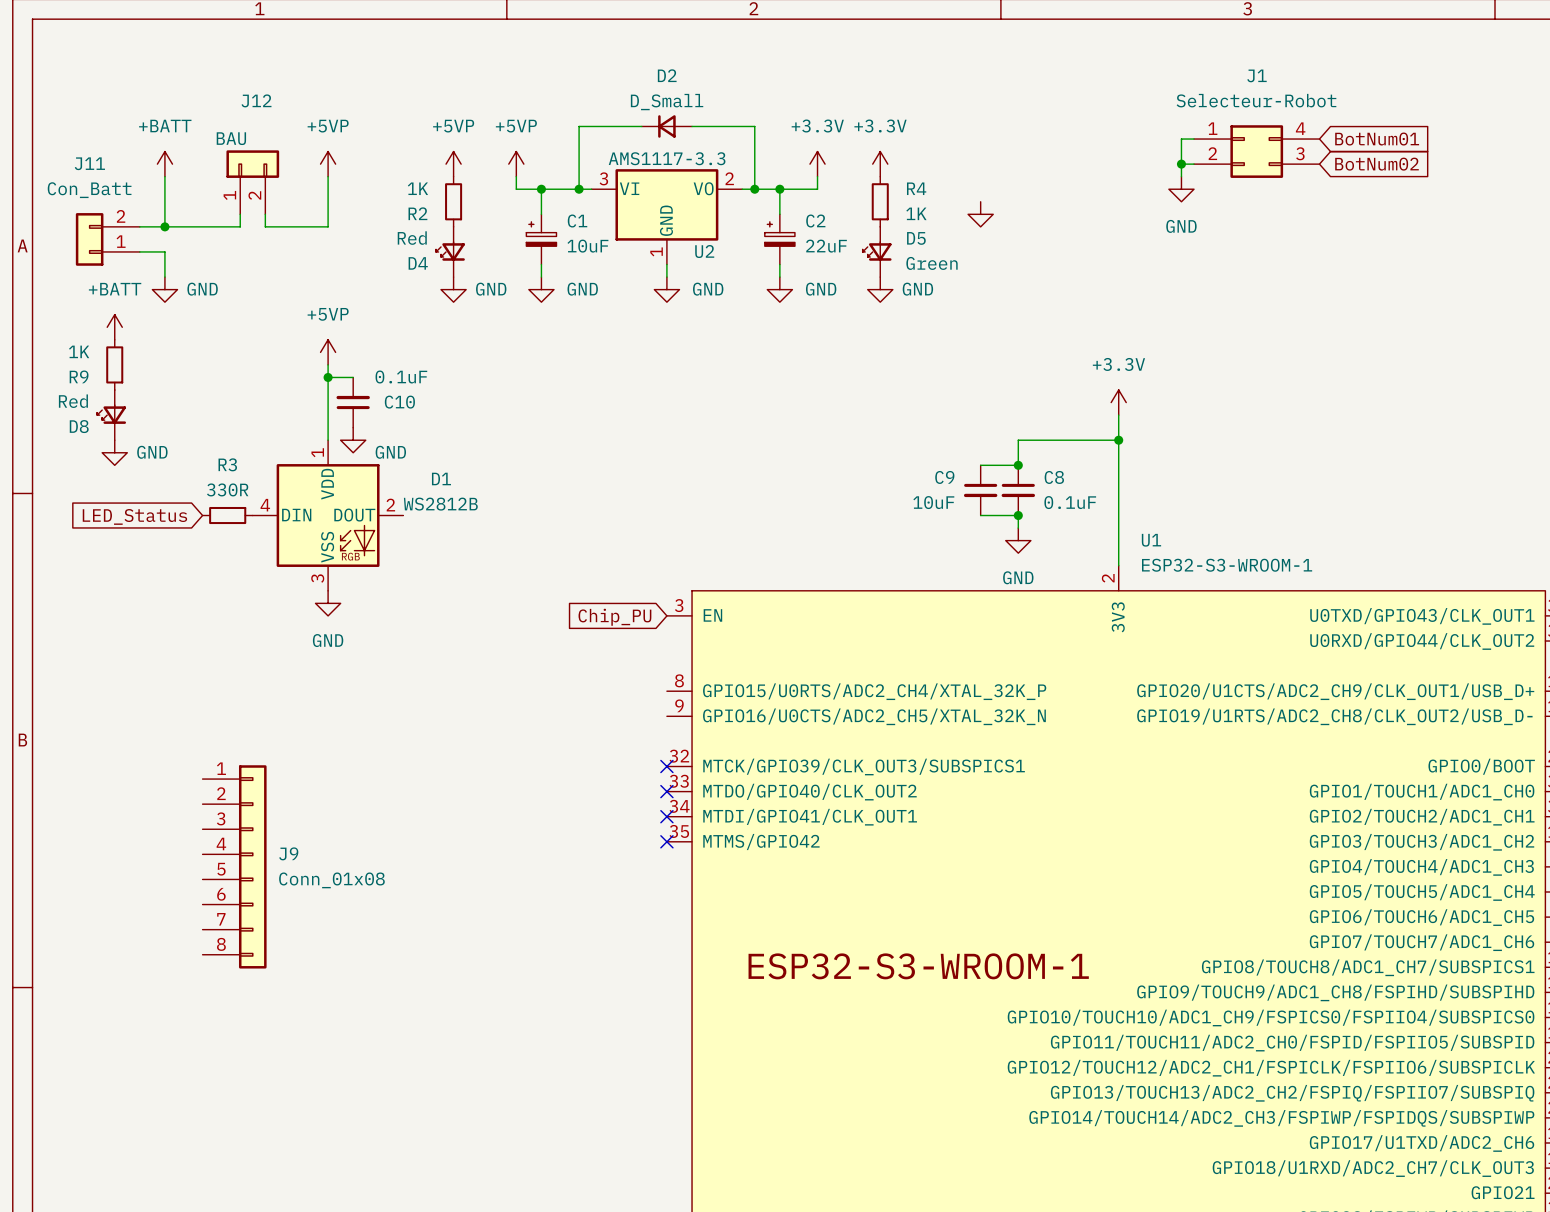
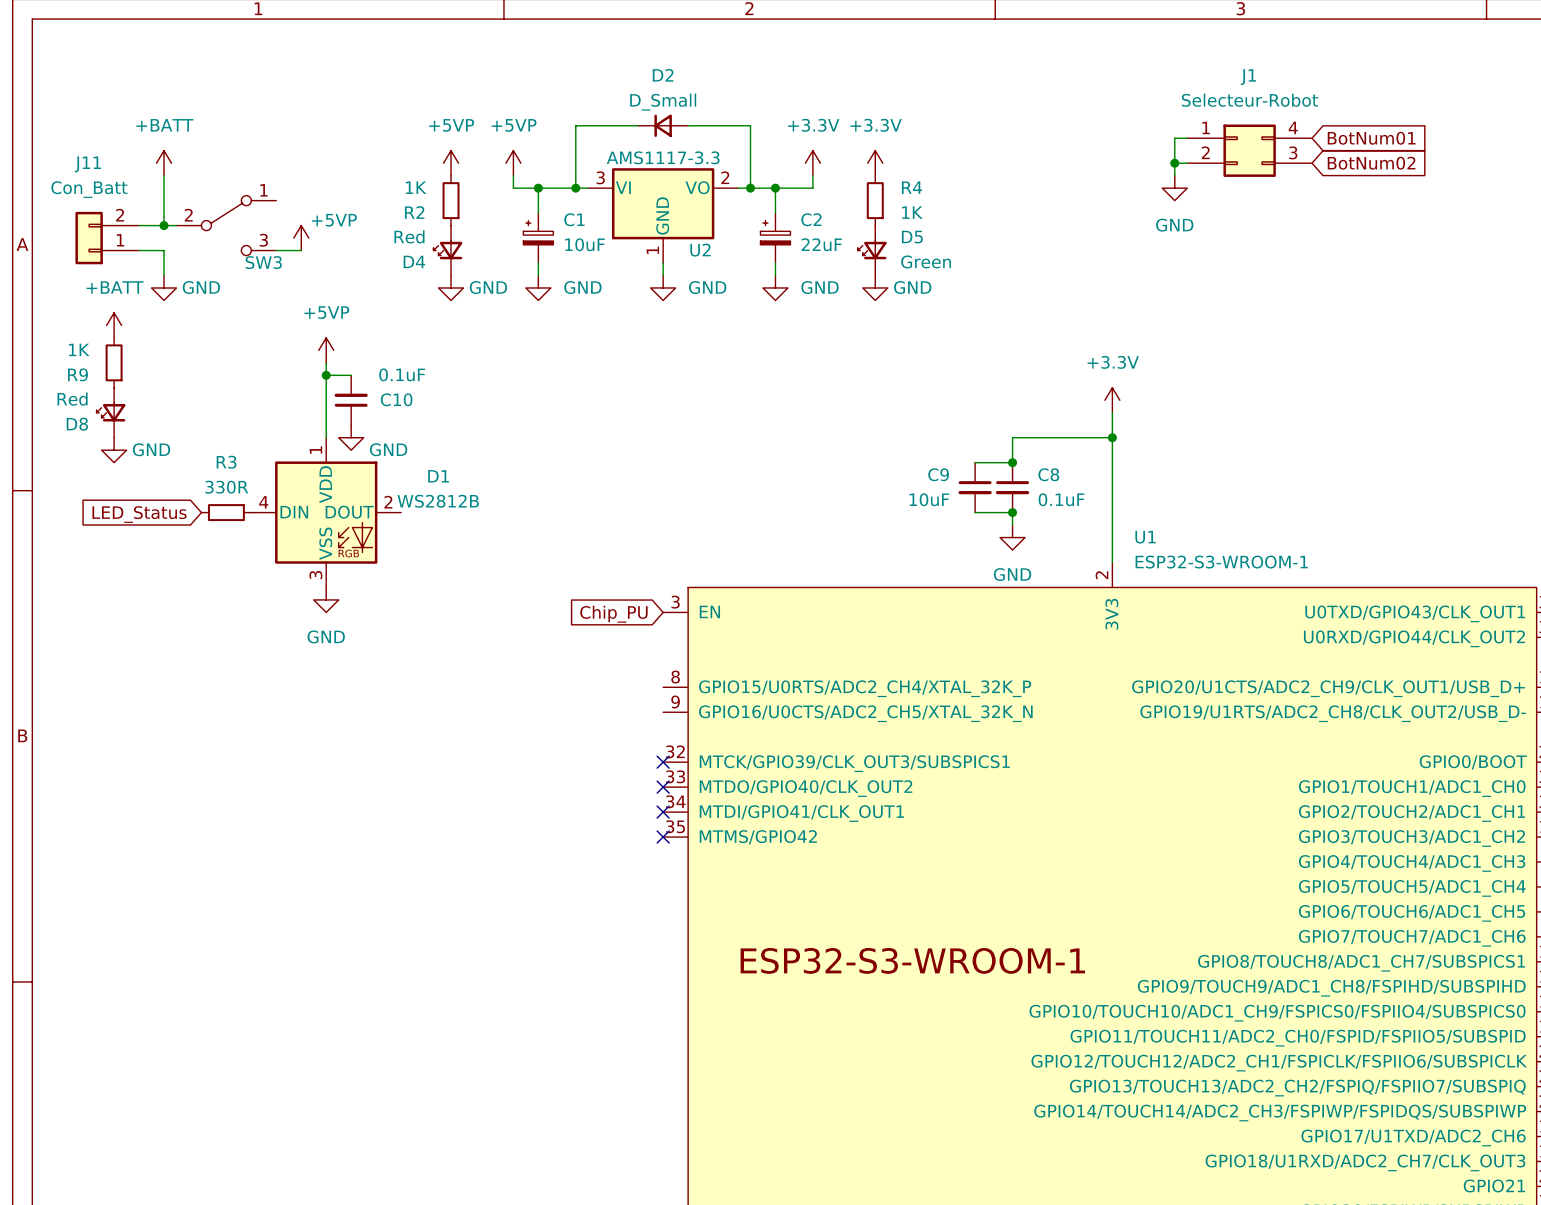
power symbol text position: +5VP (328, 126) -> +5VP (334, 220)
power symbol position: +5VP (328, 164) -> +5VP (301, 238)
wire: (328, 176) (328, 226) (265, 226) (265, 214) -> none
J12: BAU (252, 182) -> none
wire: (240, 214) (240, 226) (177, 226) -> none
power symbol: (980, 214) -> none
SW3: none -> (226, 225)
wire: none -> (276, 250) (301, 250)
J9: Conn_01x08 (234, 866) -> none

